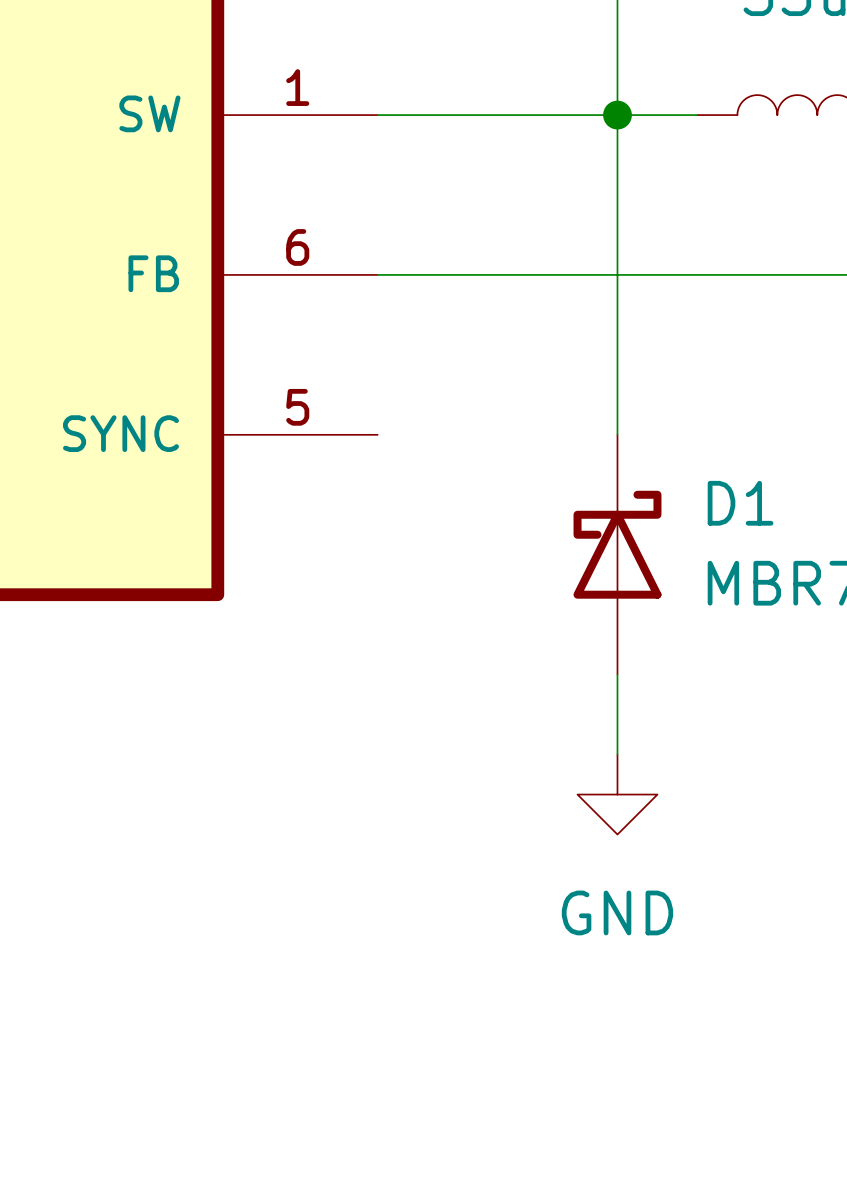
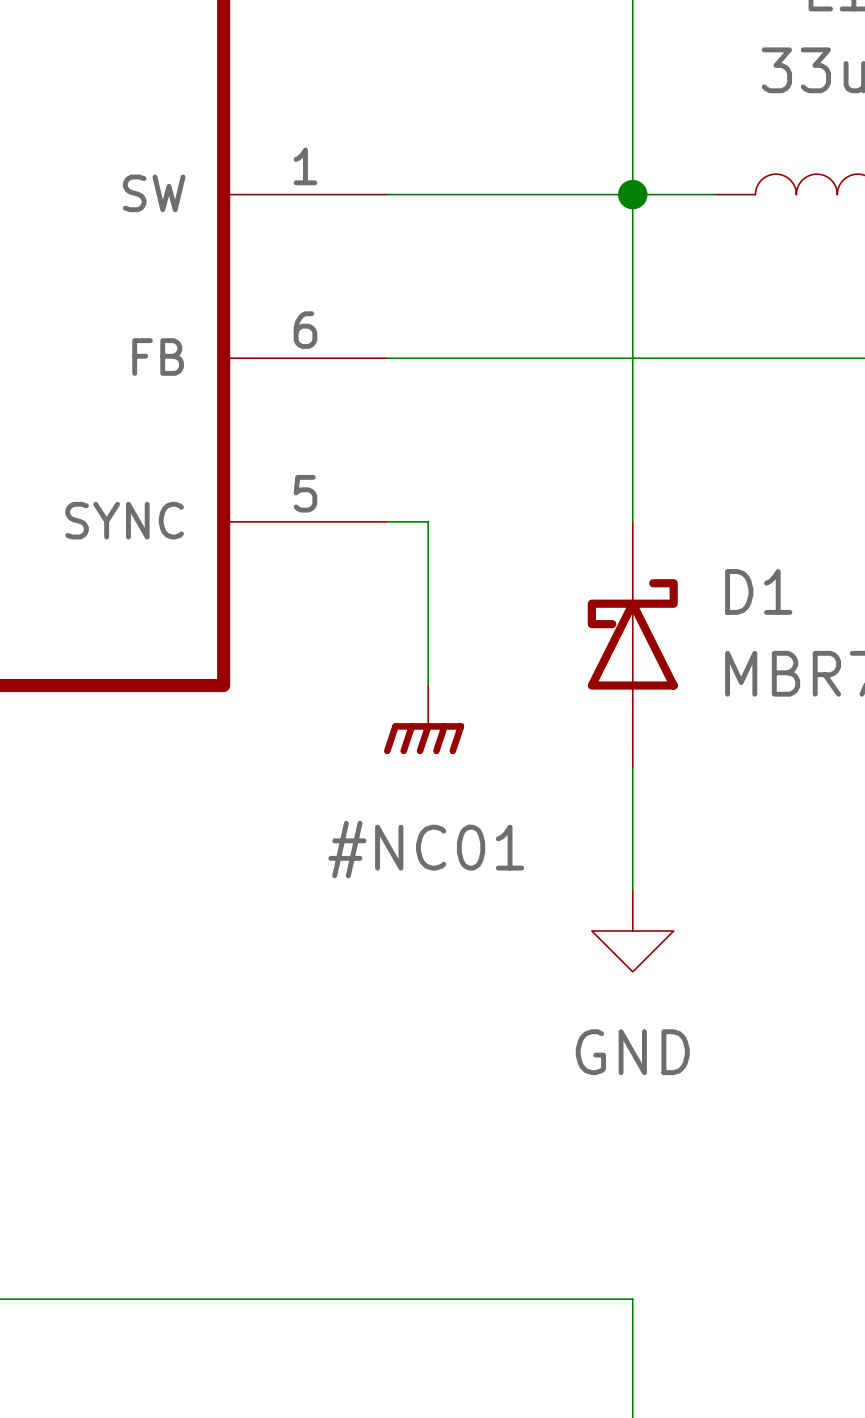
wire: none -> (387, 521) (428, 521) (428, 685)
#NC01: none -> (424, 719)
power symbol position: GND (617, 794) -> GND (632, 930)

